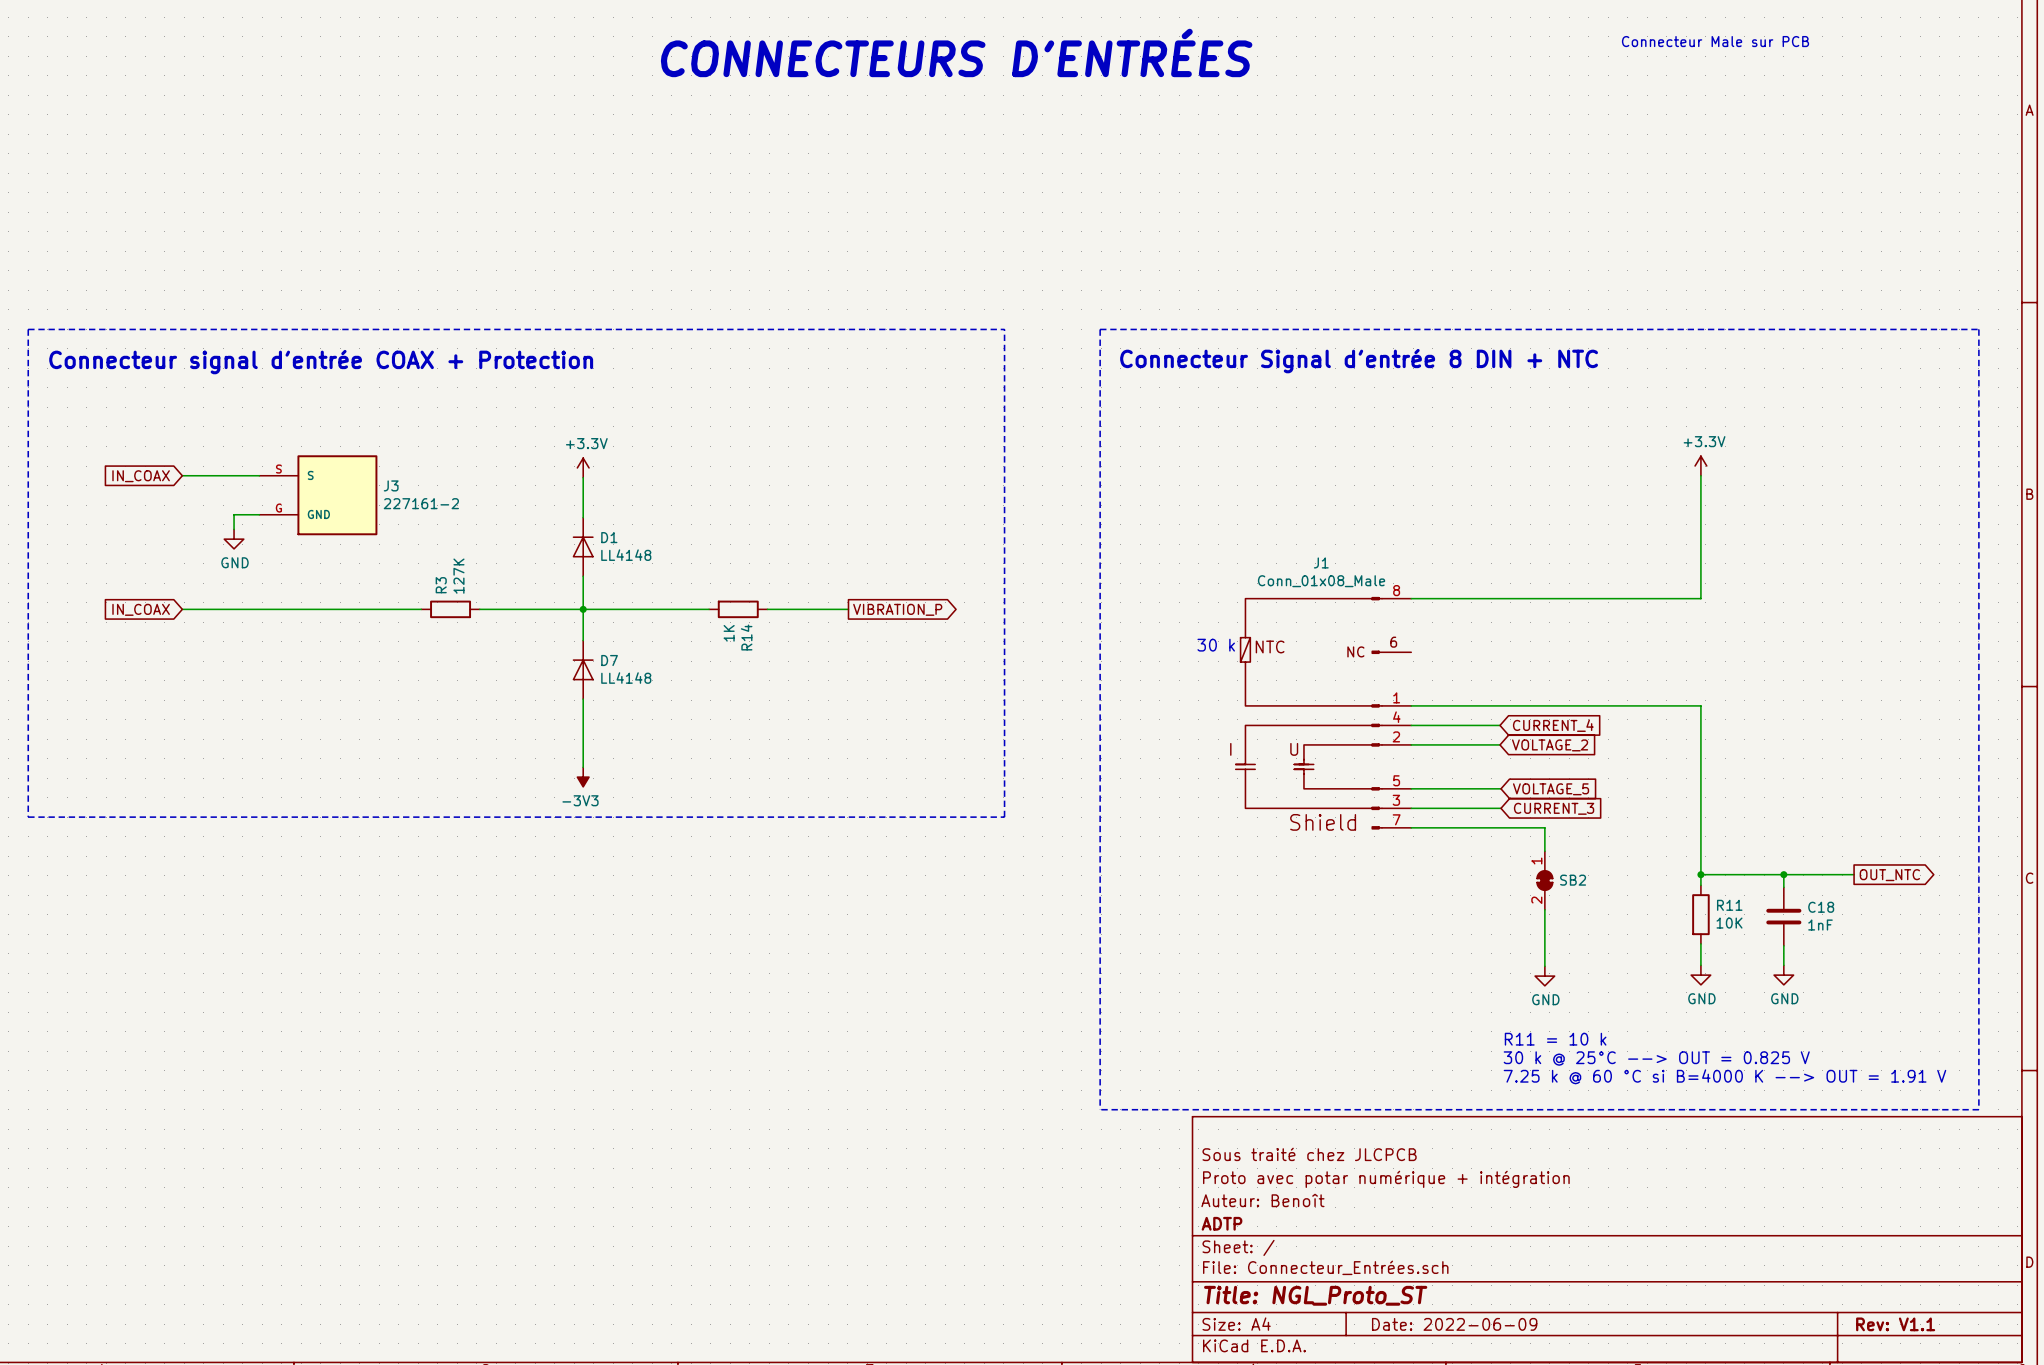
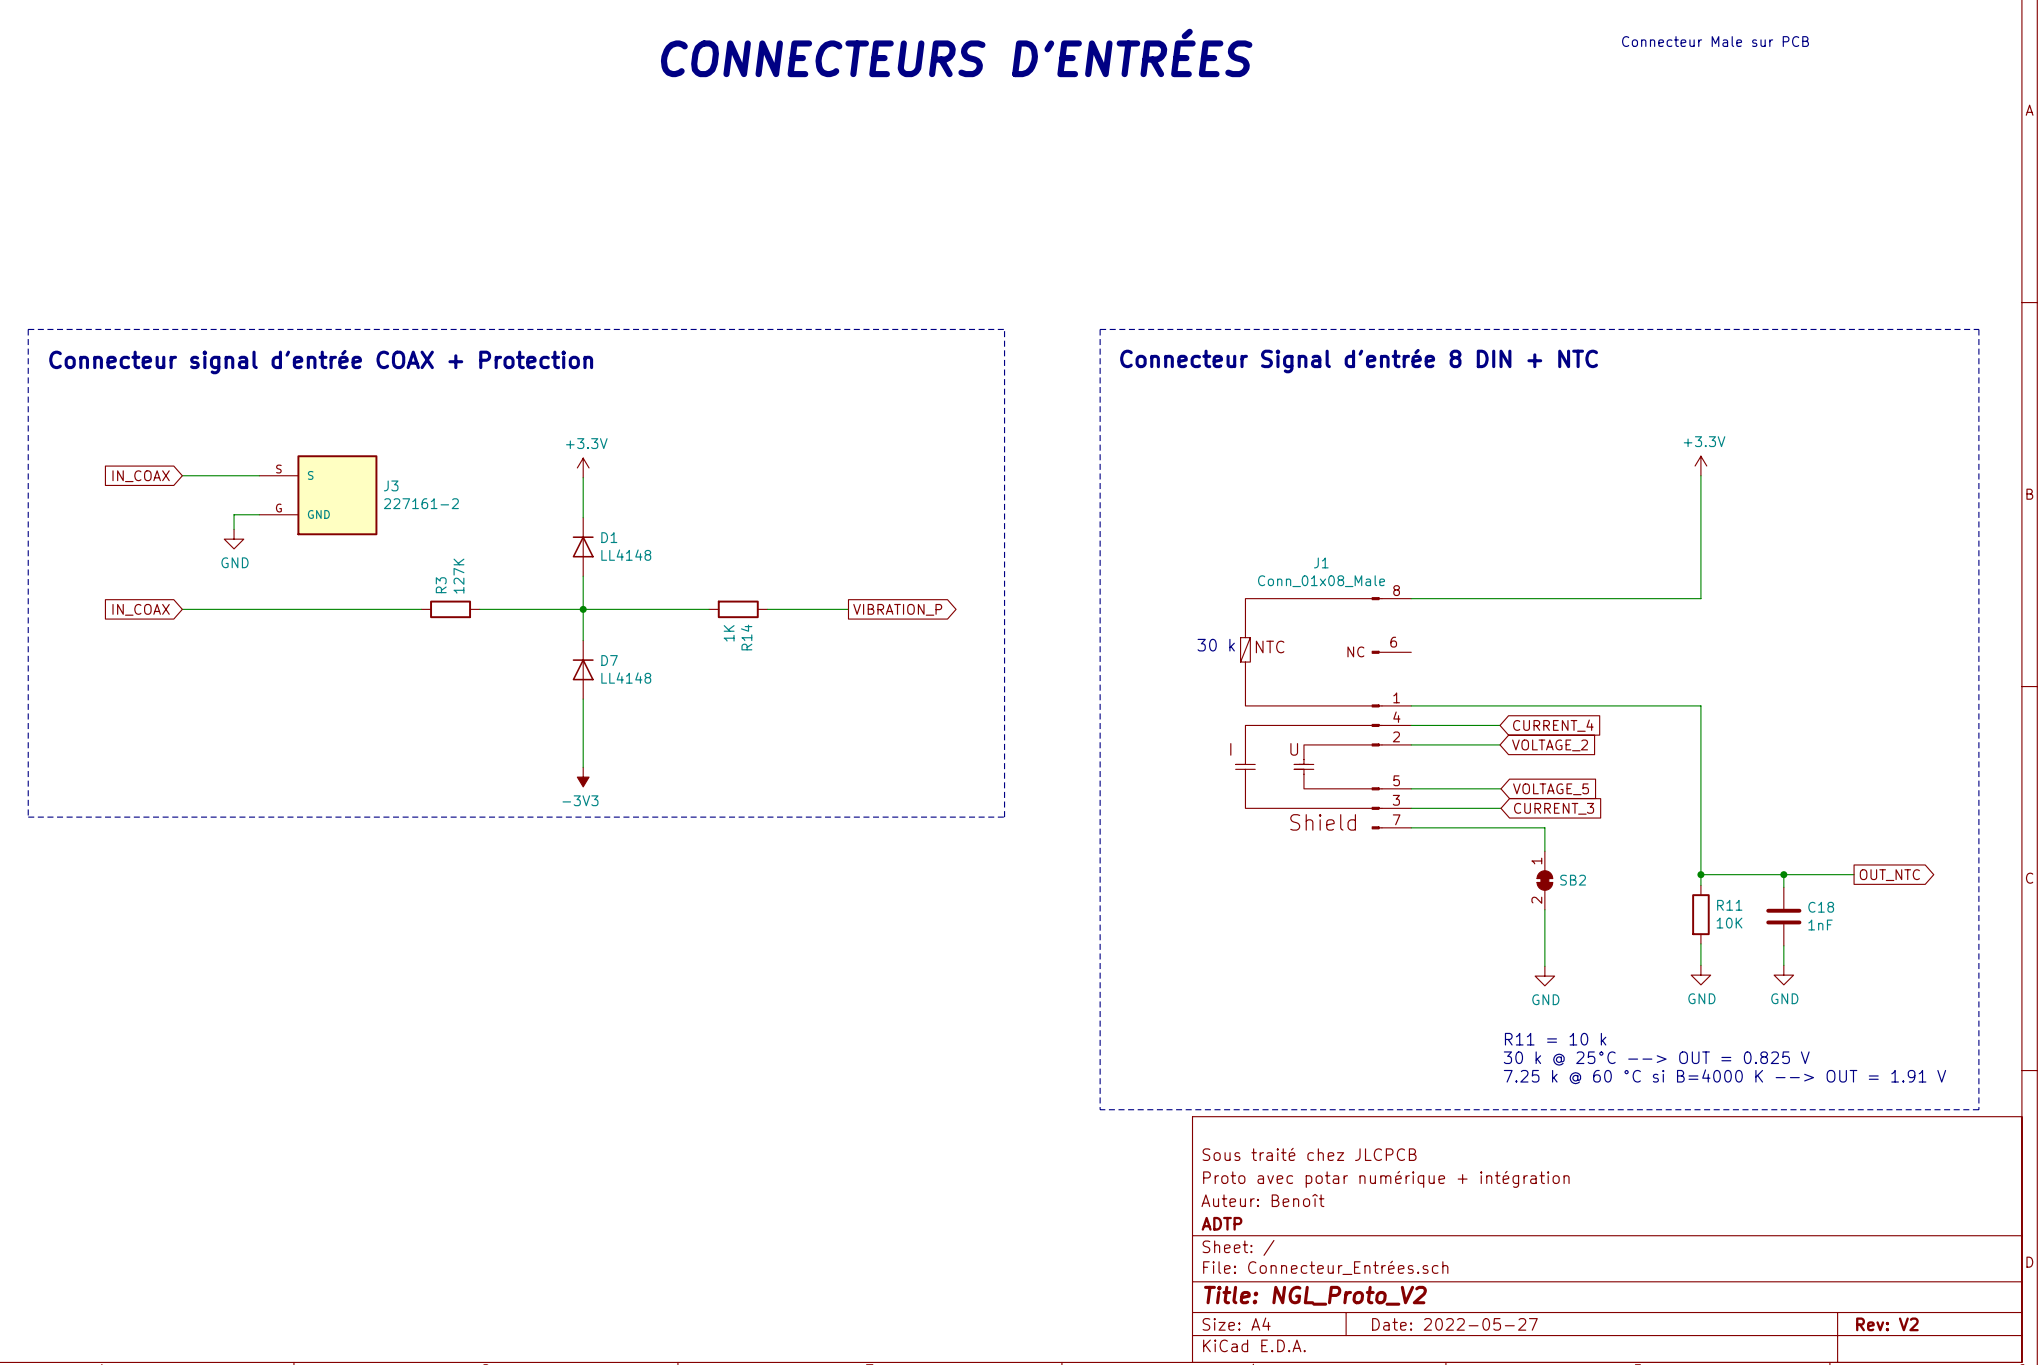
title block: Title: NGL_Proto_ST (1315, 1295) -> Title: NGL_Proto_V2 (1315, 1295)
title block: Date: 2022-06-09 (1454, 1324) -> Date: 2022-05-27 (1454, 1324)
title block: Rev: V1.1 (1895, 1324) -> Rev: V2 (1887, 1324)

